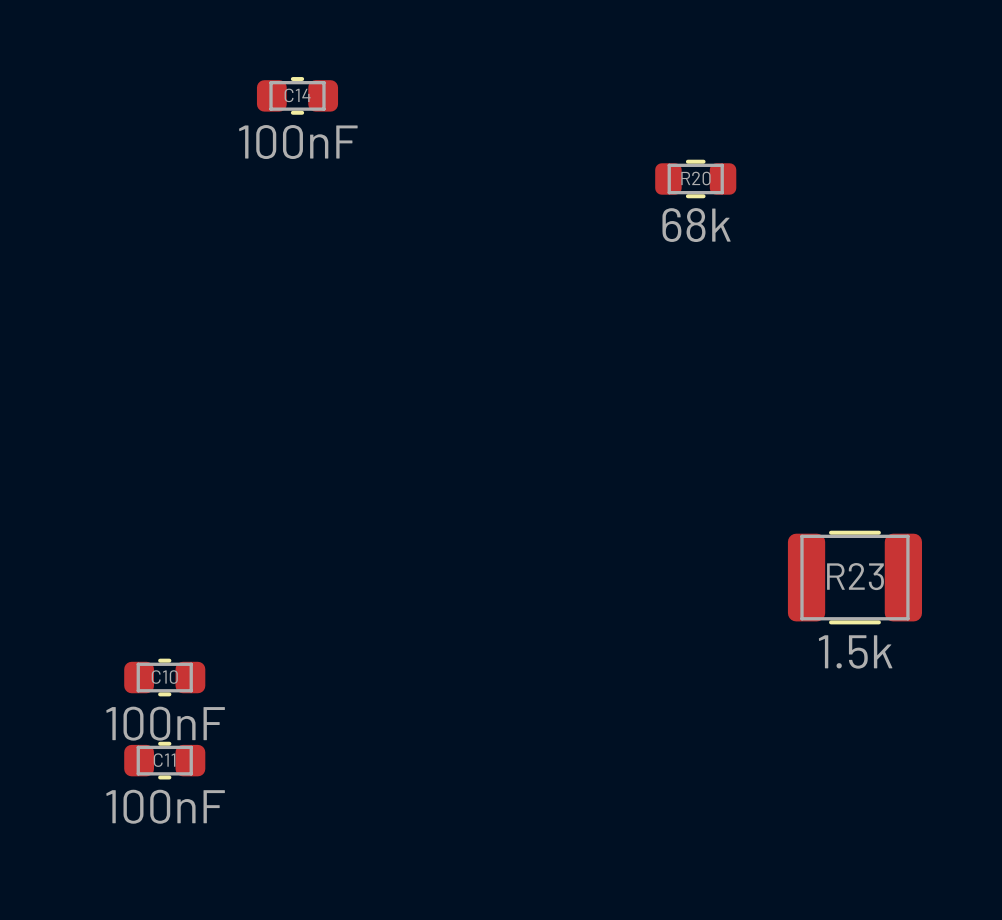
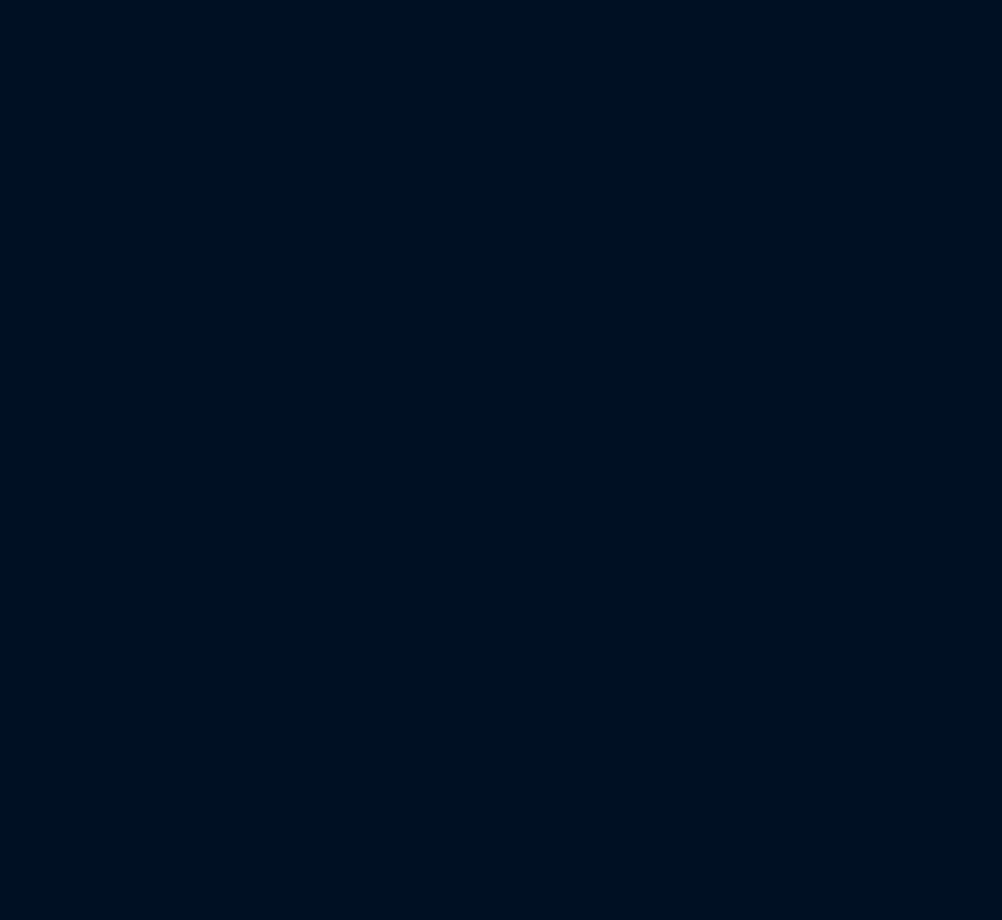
C14: 100nF (297, 95) -> none
R20: 68k (695, 178) -> none
R23: 1.5k (854, 577) -> none
C10: 100nF (164, 677) -> none
C11: 100nF (164, 760) -> none

